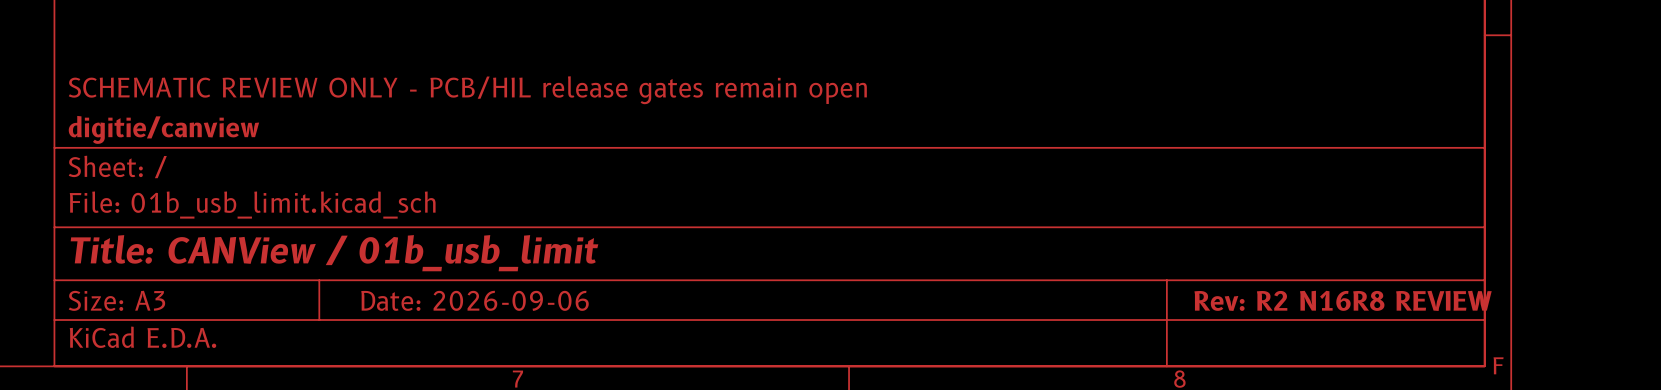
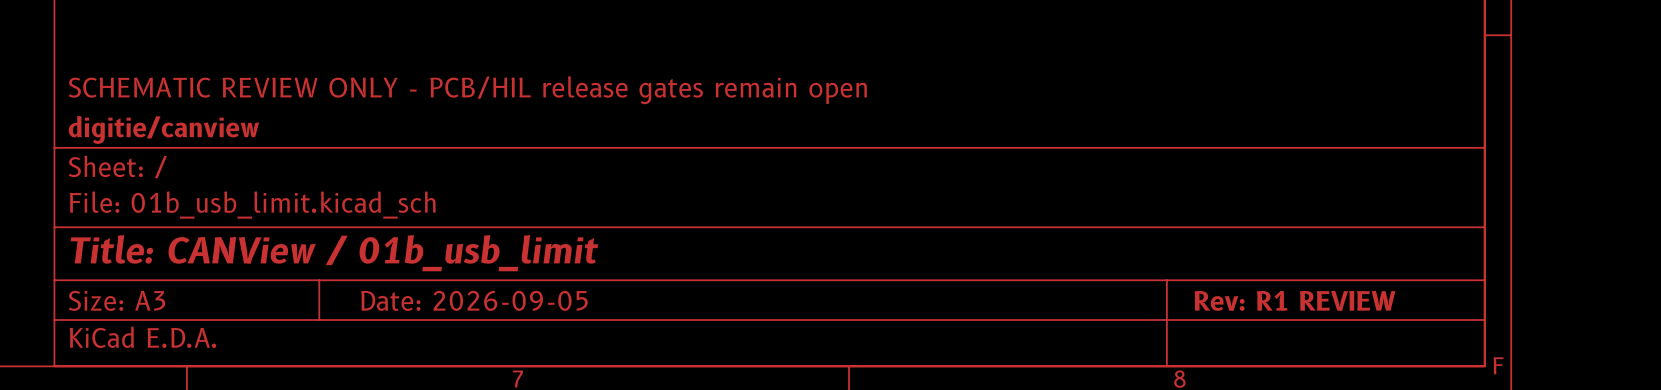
title block: Date: 2026-09-06 (475, 300) -> Date: 2026-09-05 (474, 300)
title block: Rev: R2 N16R8 REVIEW (1343, 300) -> Rev: R1 REVIEW (1294, 300)

